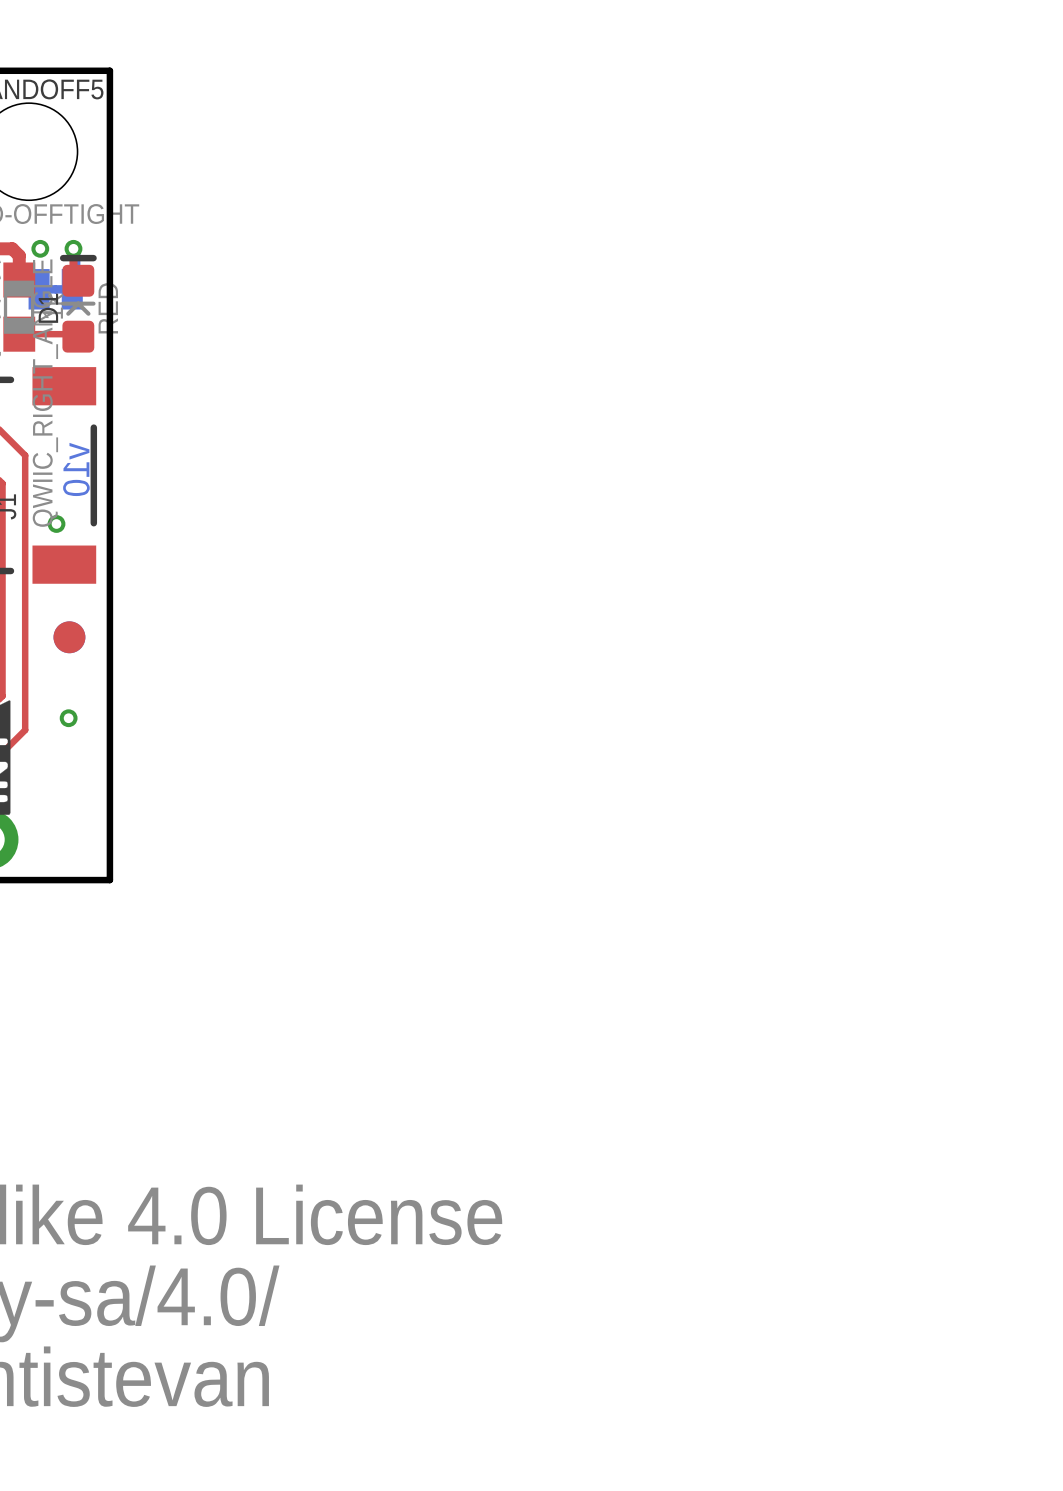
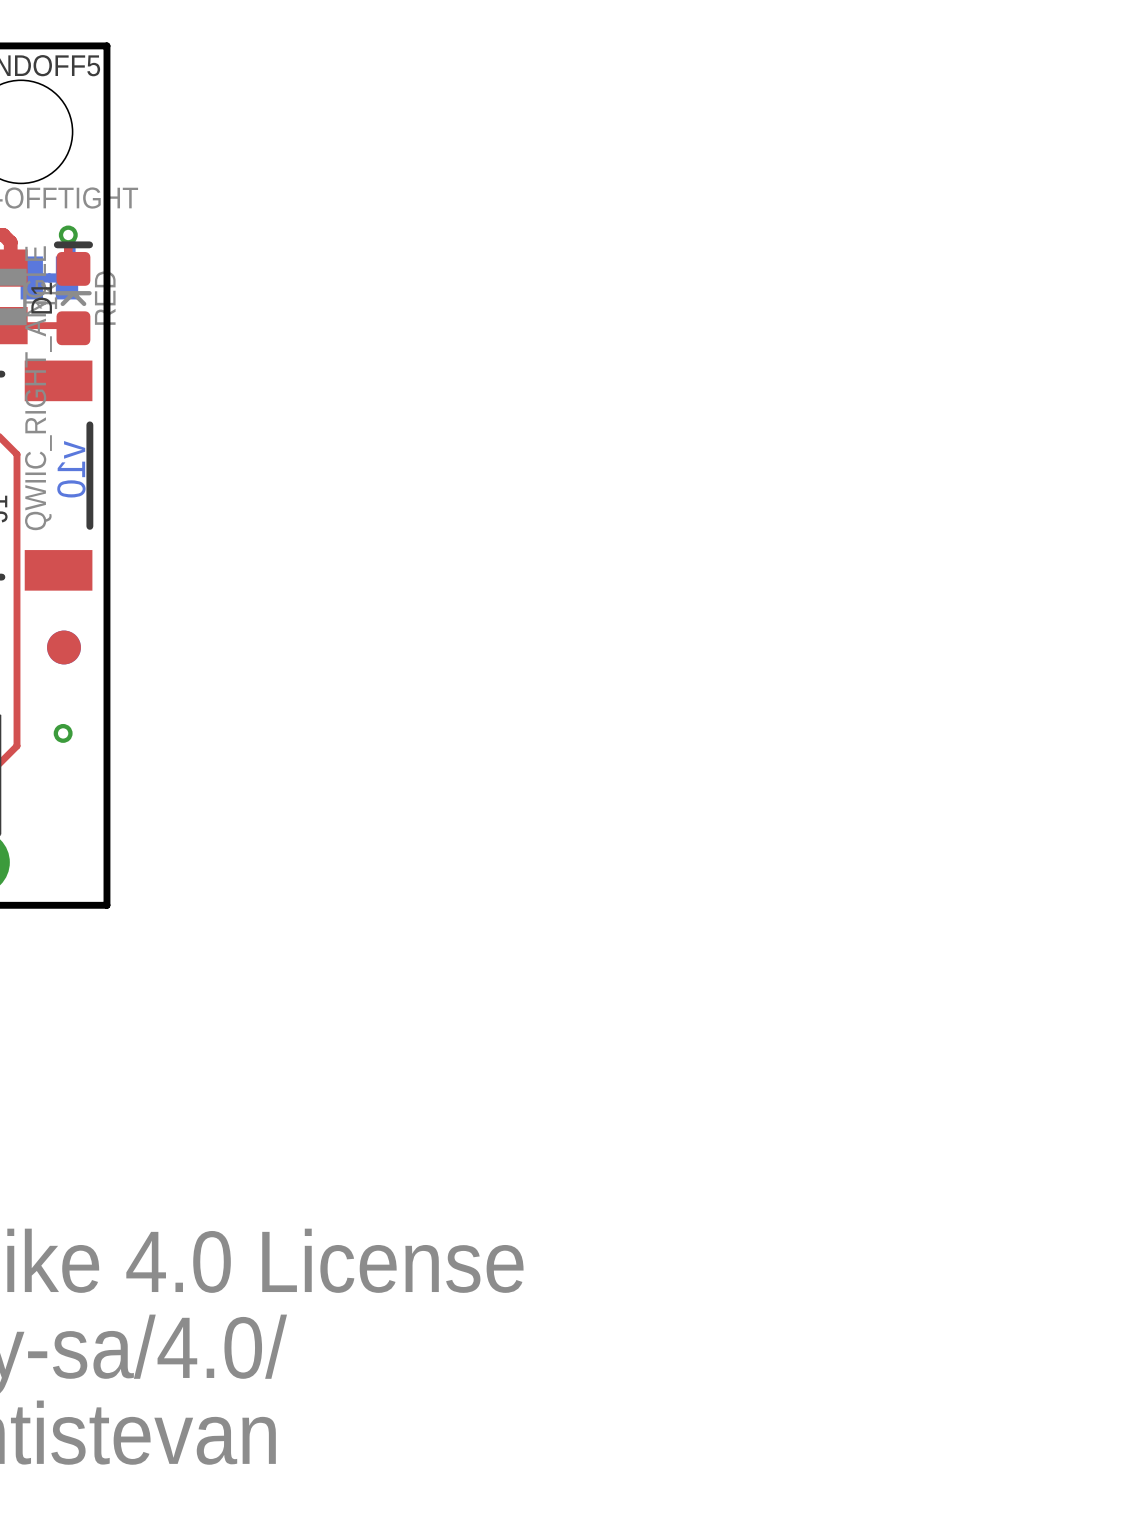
via: (40, 248) -> none
via: (56, 523) -> none

